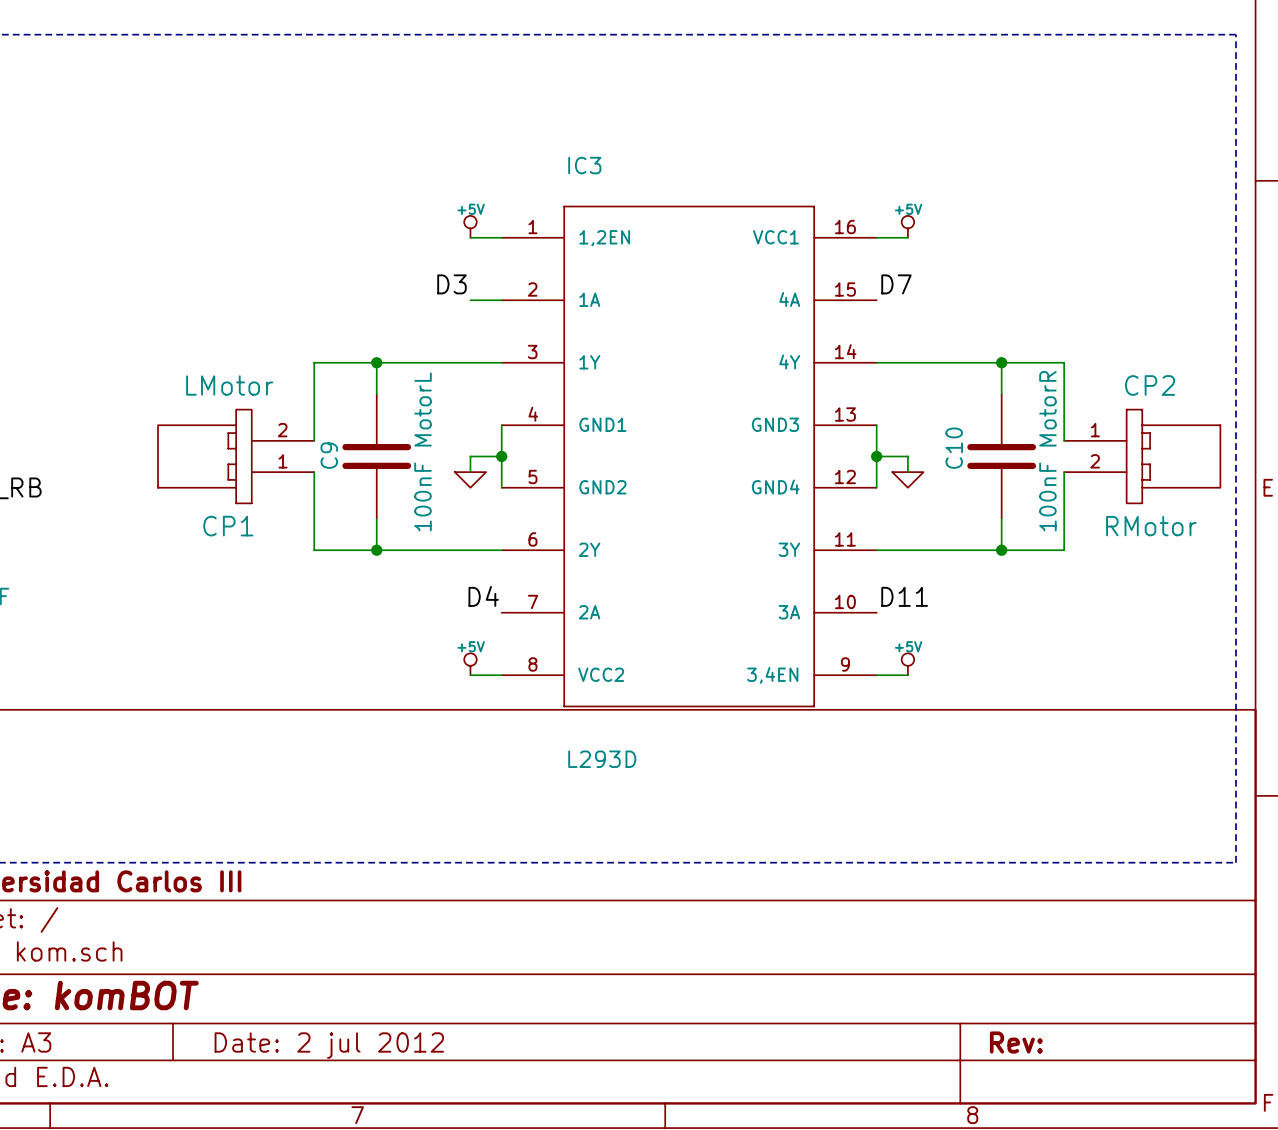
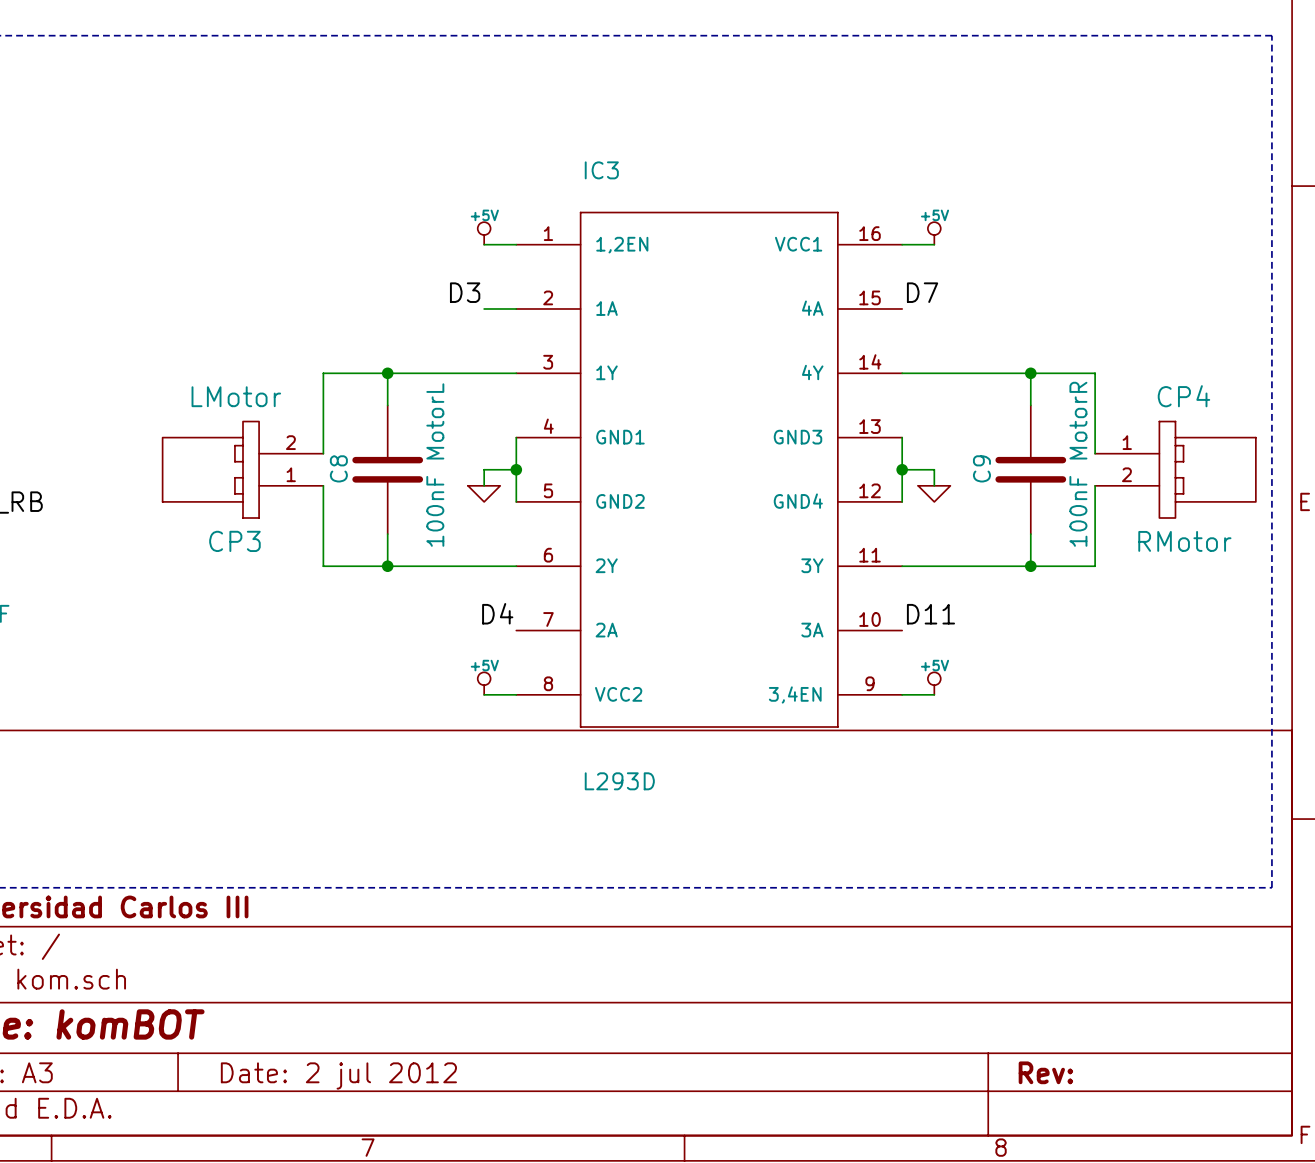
CP2 name: CP2 (1150, 385) -> CP4 (1183, 396)
C10 name: C10 (954, 448) -> C9 (981, 468)
C9 name: C9 (329, 455) -> C8 (338, 468)
CP1 name: CP1 (228, 526) -> CP3 (234, 541)

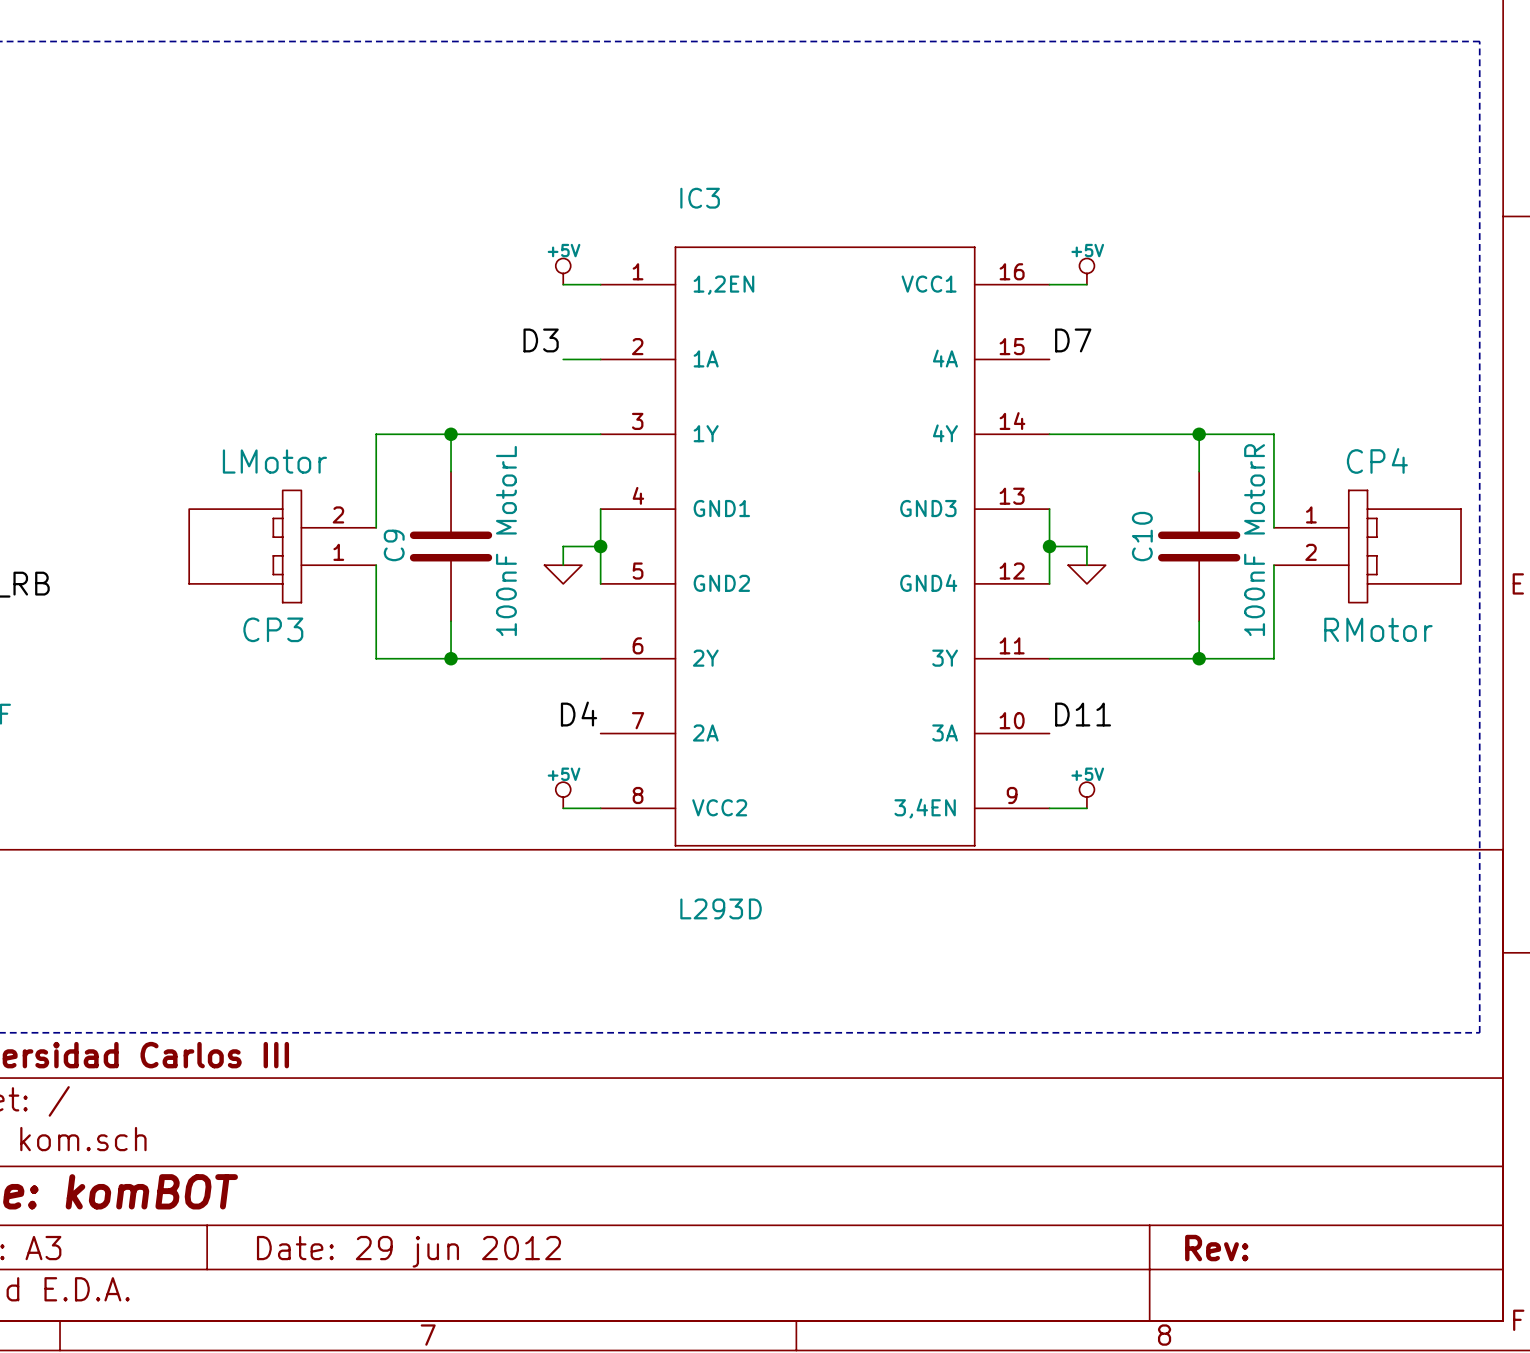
C8 name: C8 (338, 468) -> C9 (394, 545)
C9 name: C9 (981, 468) -> C10 (1142, 536)
title block: Date: 2 jul 2012 (338, 1075) -> Date: 29 jun 2012 (408, 1251)

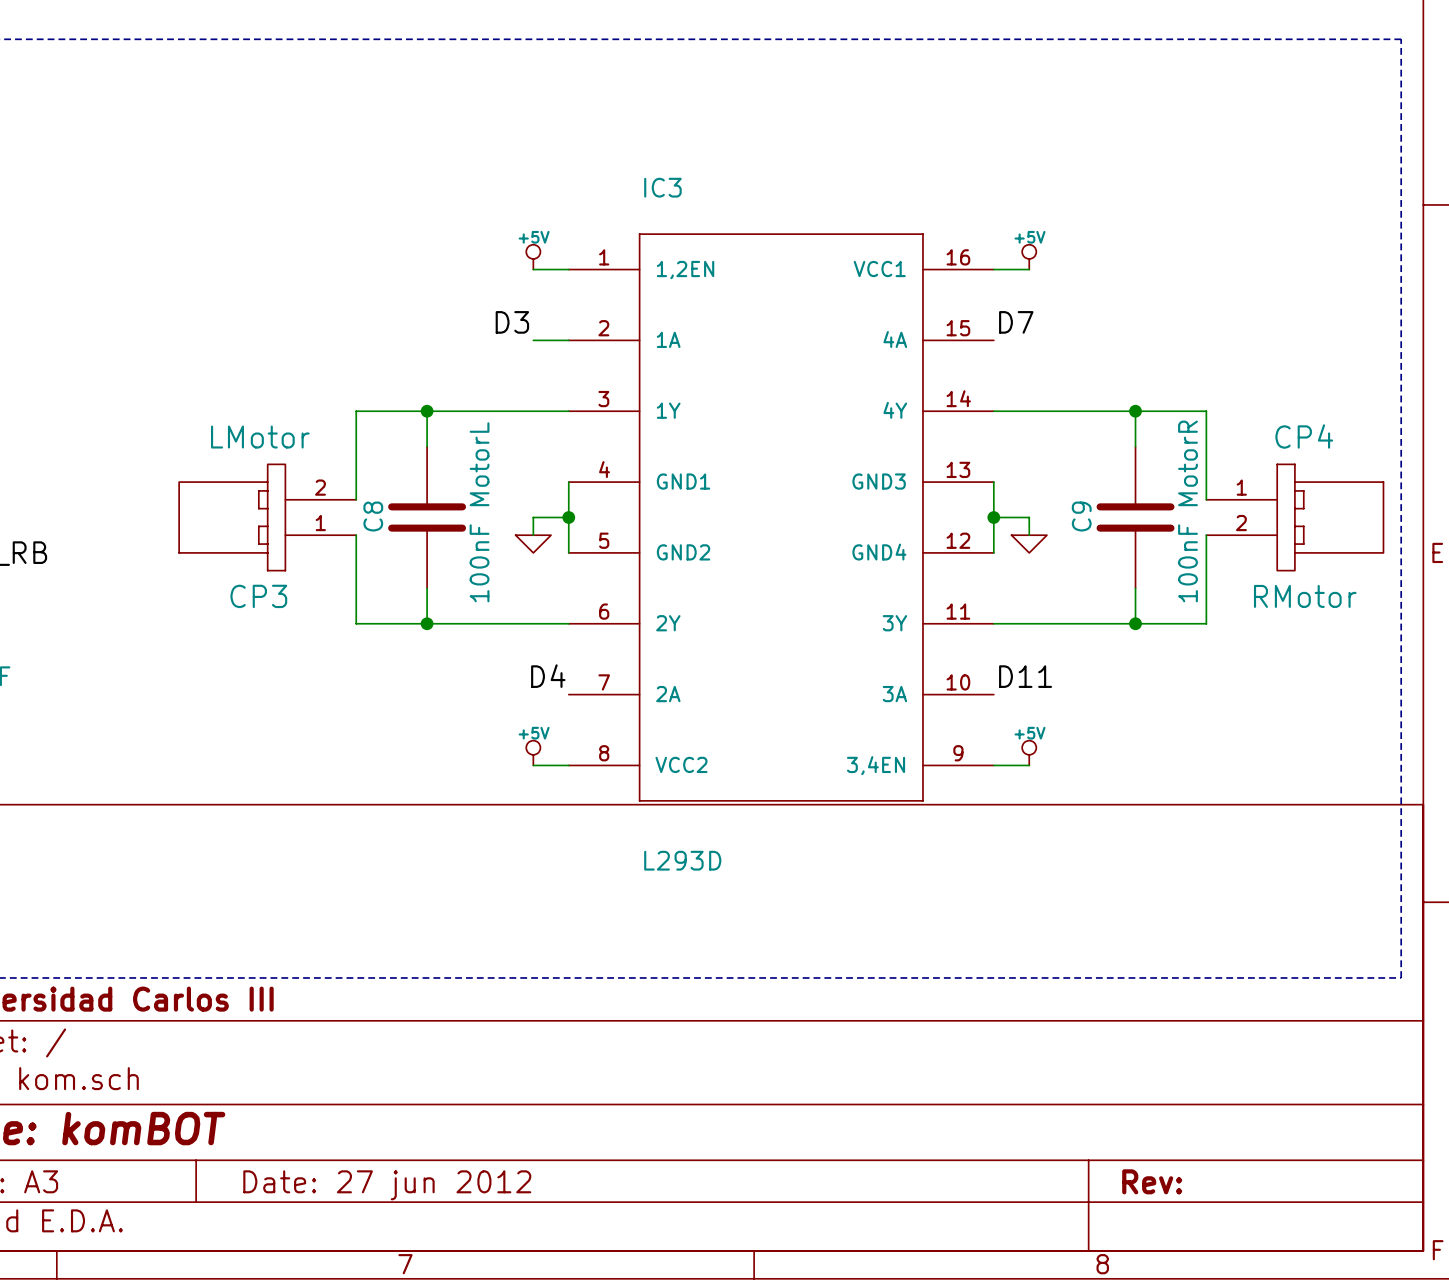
C10 name: C10 (1142, 536) -> C9 (1081, 516)
C9 name: C9 (394, 545) -> C8 (373, 516)
title block: Date: 29 jun 2012 (408, 1251) -> Date: 27 jun 2012 (387, 1185)

